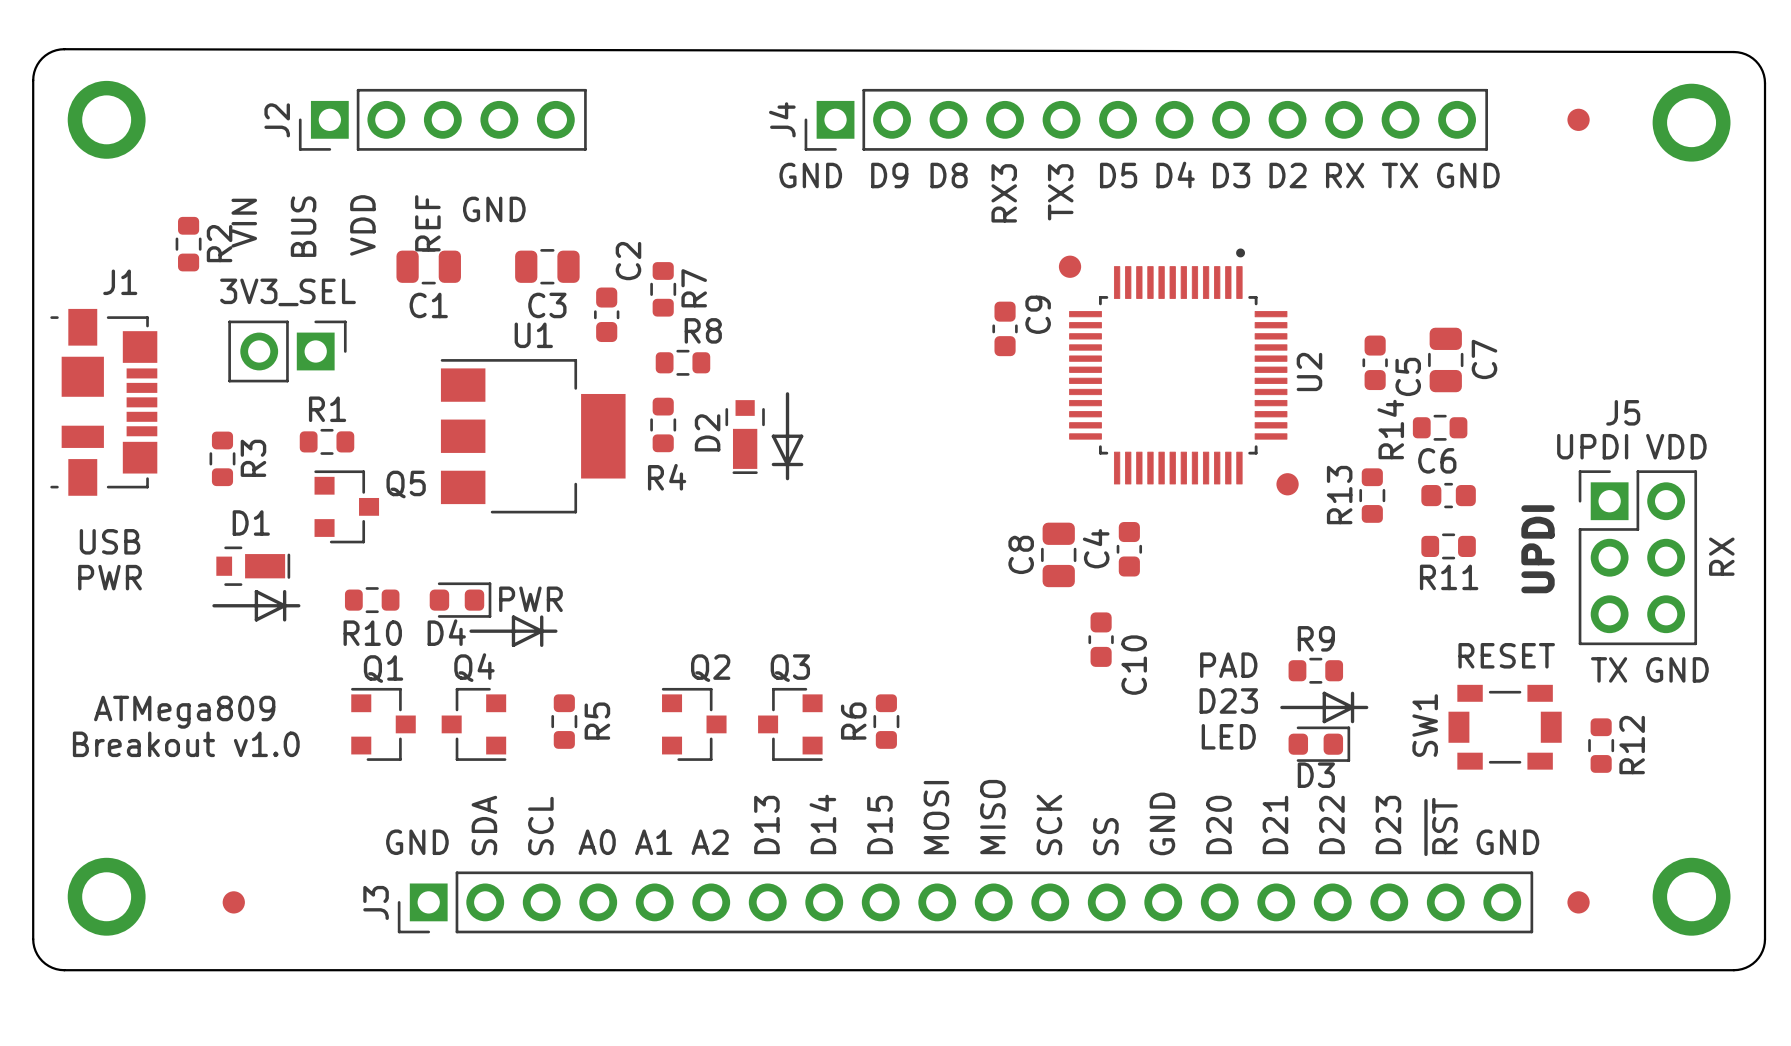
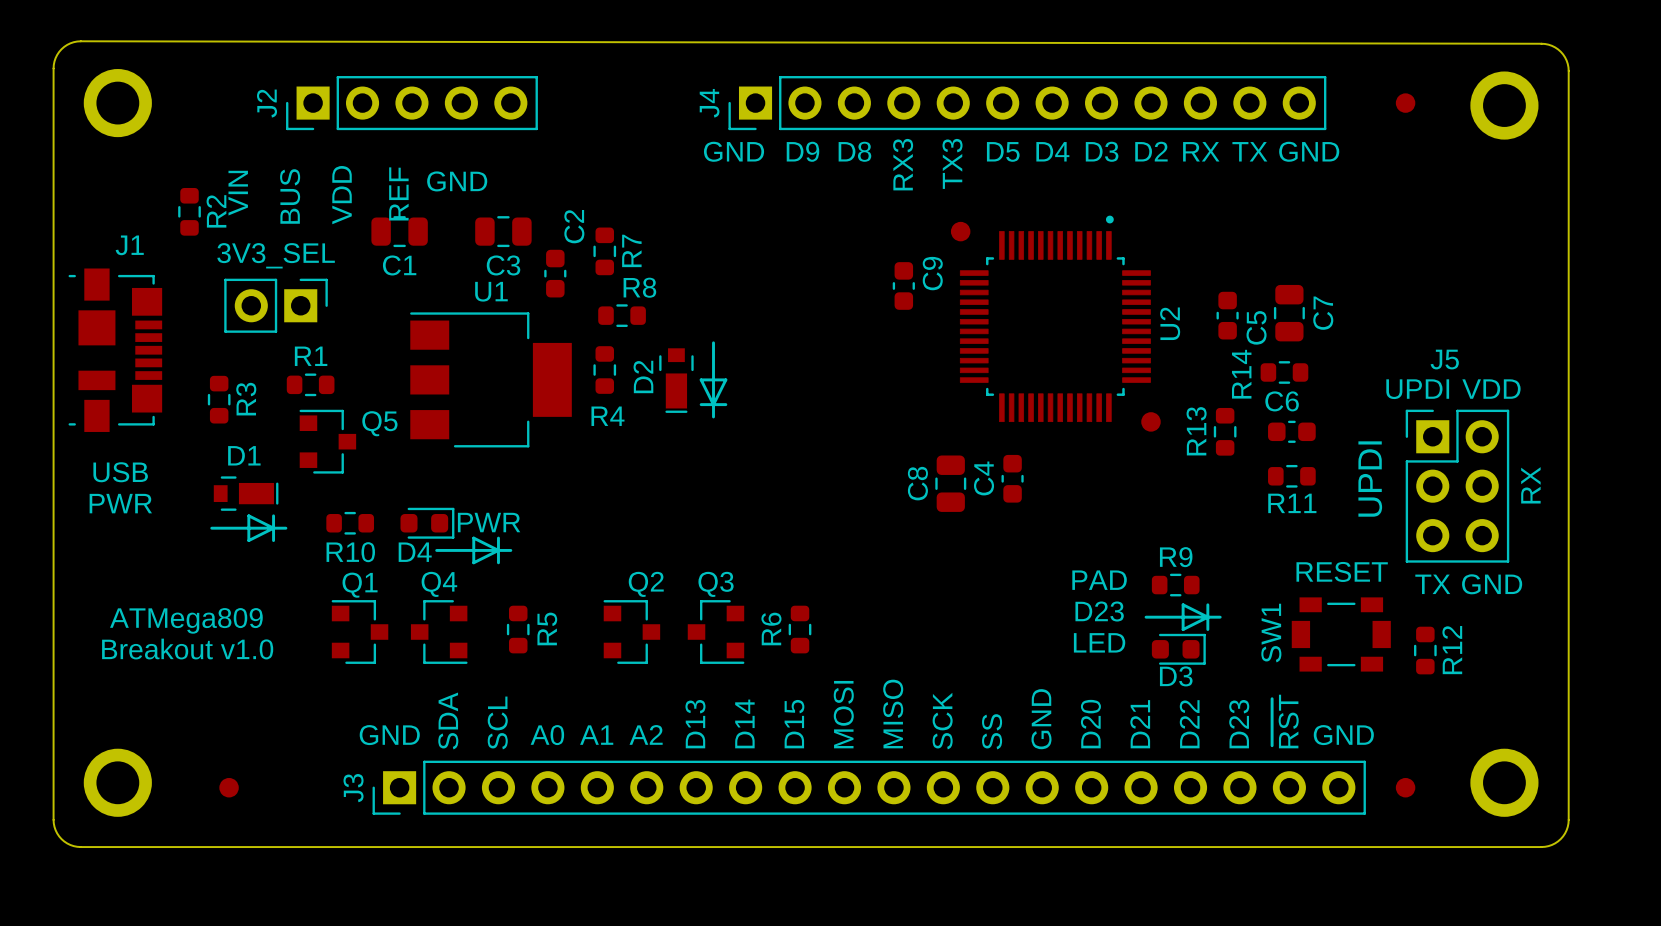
C10: (1101, 639) -> none

